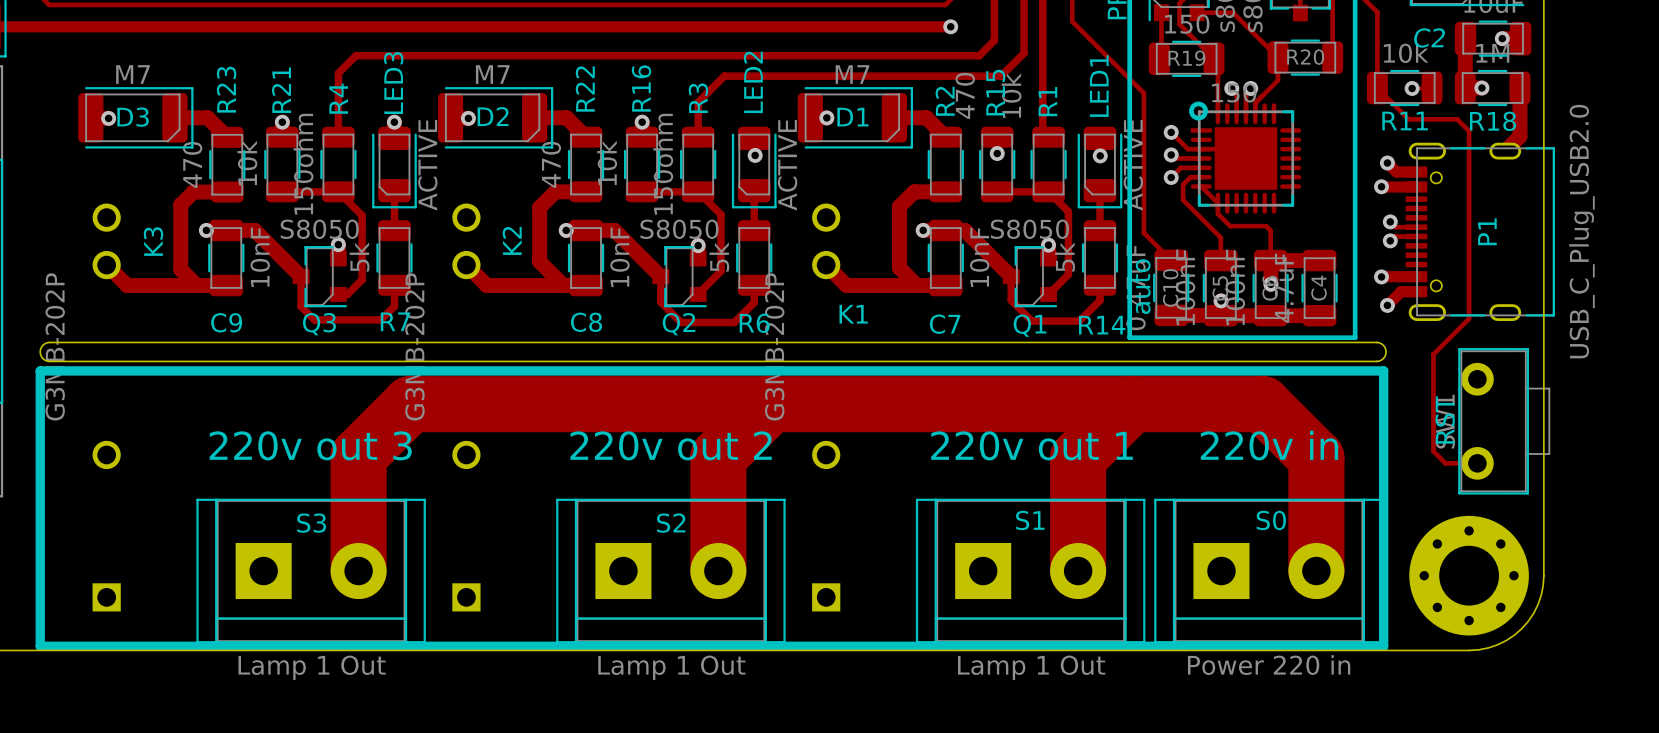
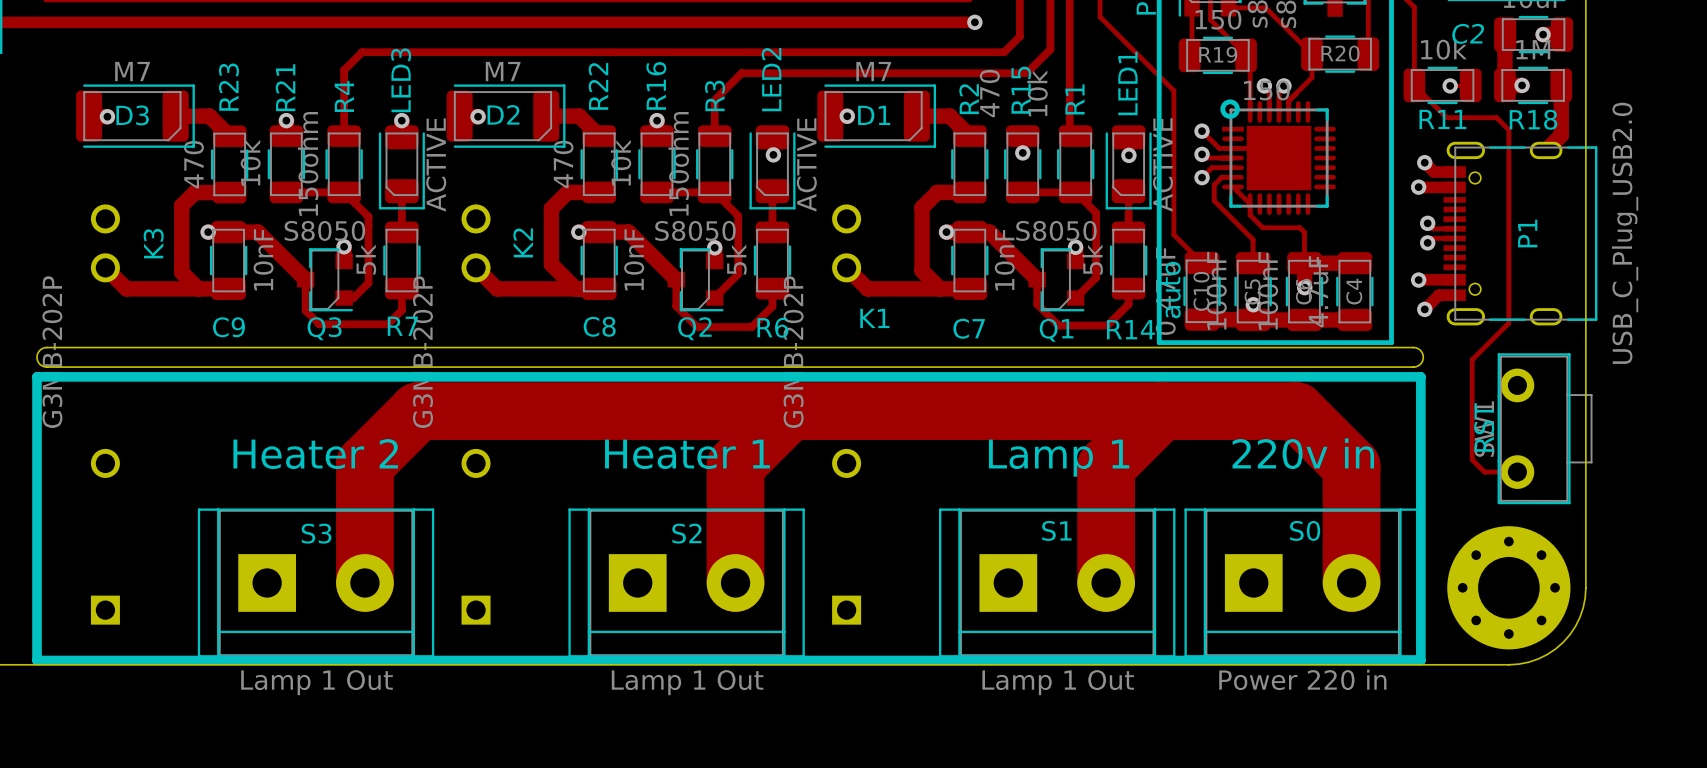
text: 220v out 3 (310, 445) -> Heater 2 (315, 454)
text: 220v out 2 (671, 445) -> Heater 1 (687, 454)
text: 220v out 1 (1032, 445) -> Lamp 1 (1059, 458)

